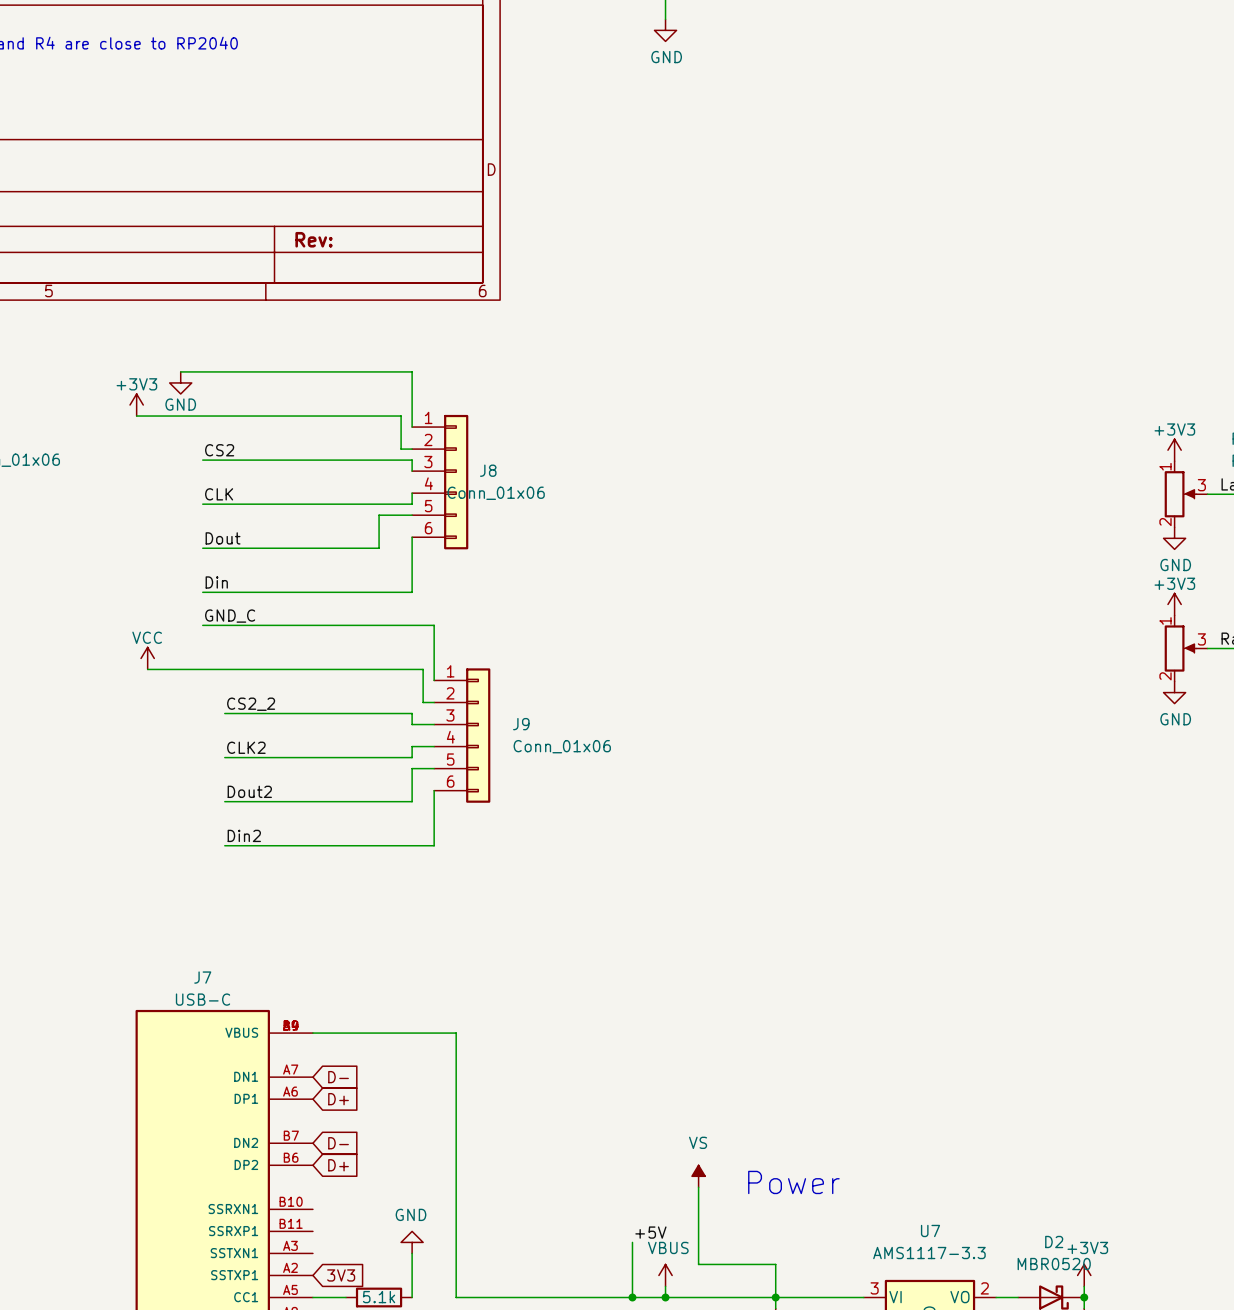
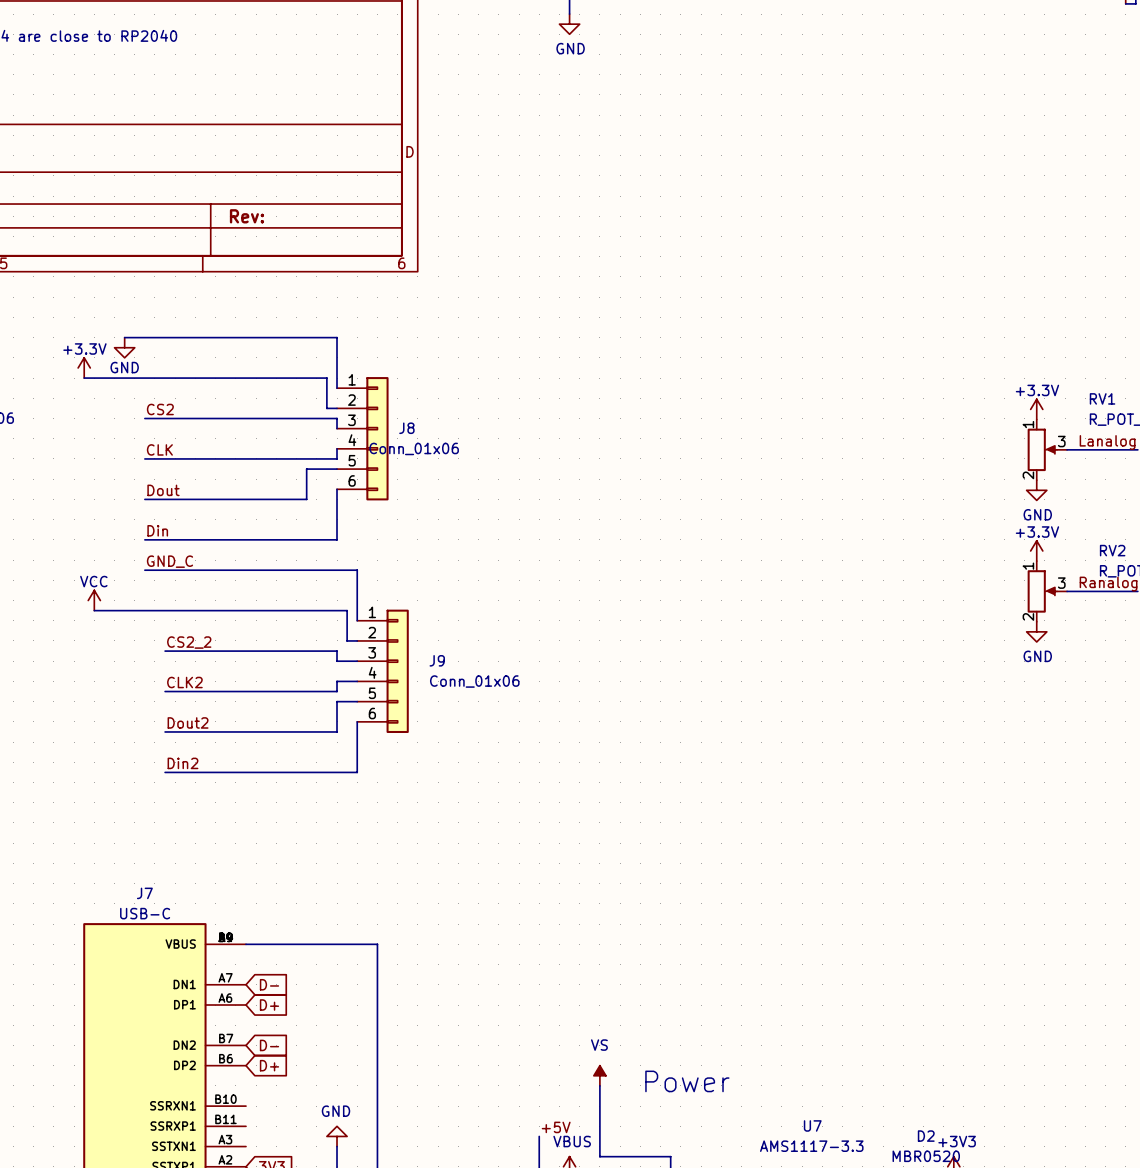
power symbol: +3V3 (136, 405) -> +3.3V (84, 367)
power symbol: +3V3 (1174, 450) -> +3.3V (1036, 409)
power symbol: +3V3 (1174, 604) -> +3.3V (1036, 550)

